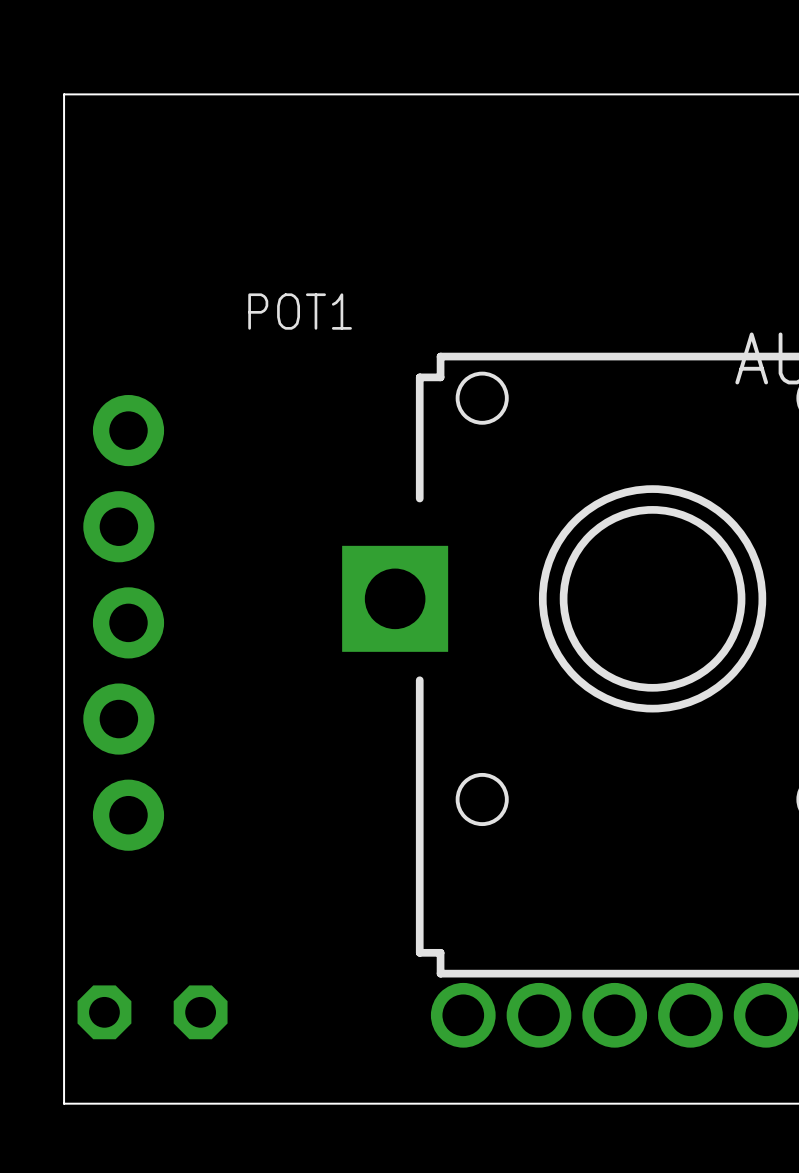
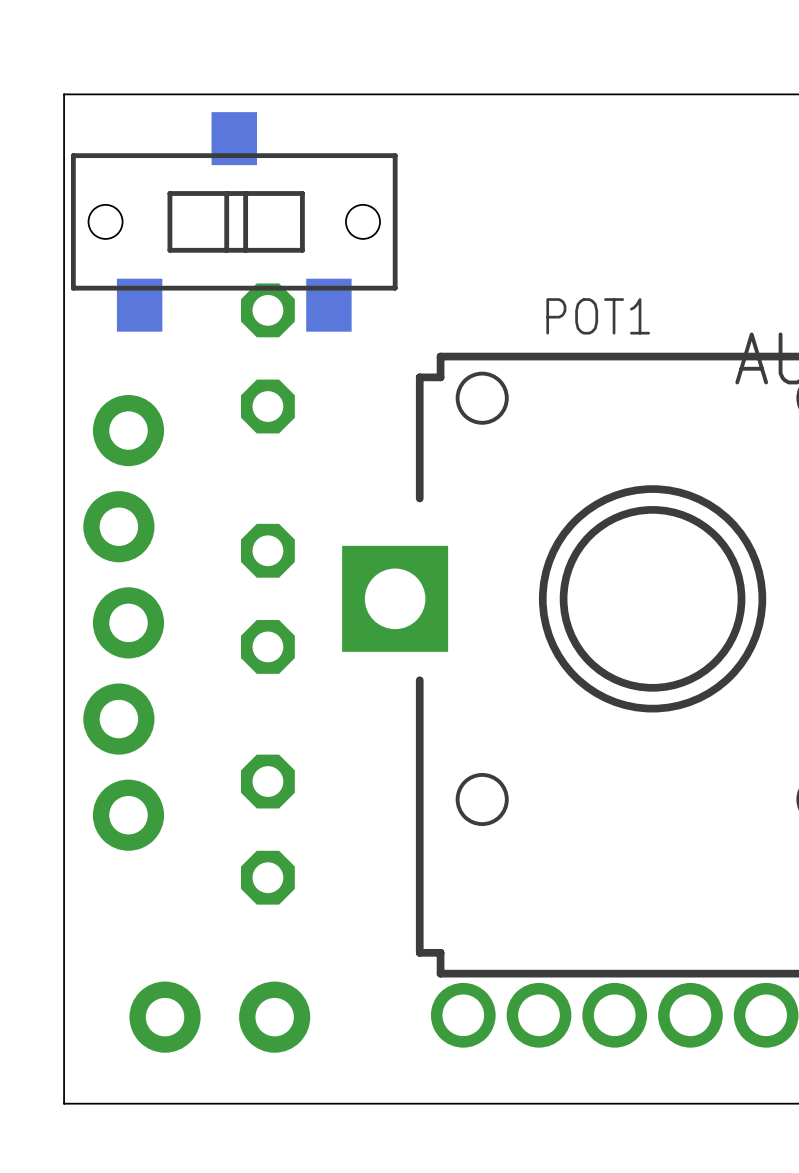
part: none -> (234, 221)
POT1 name position: POT1 (300, 311) -> POT1 (598, 316)
part: none -> (267, 358)
part: none -> (267, 598)
part: none -> (267, 829)
part: (152, 1012) -> none
part: none -> (219, 1017)

